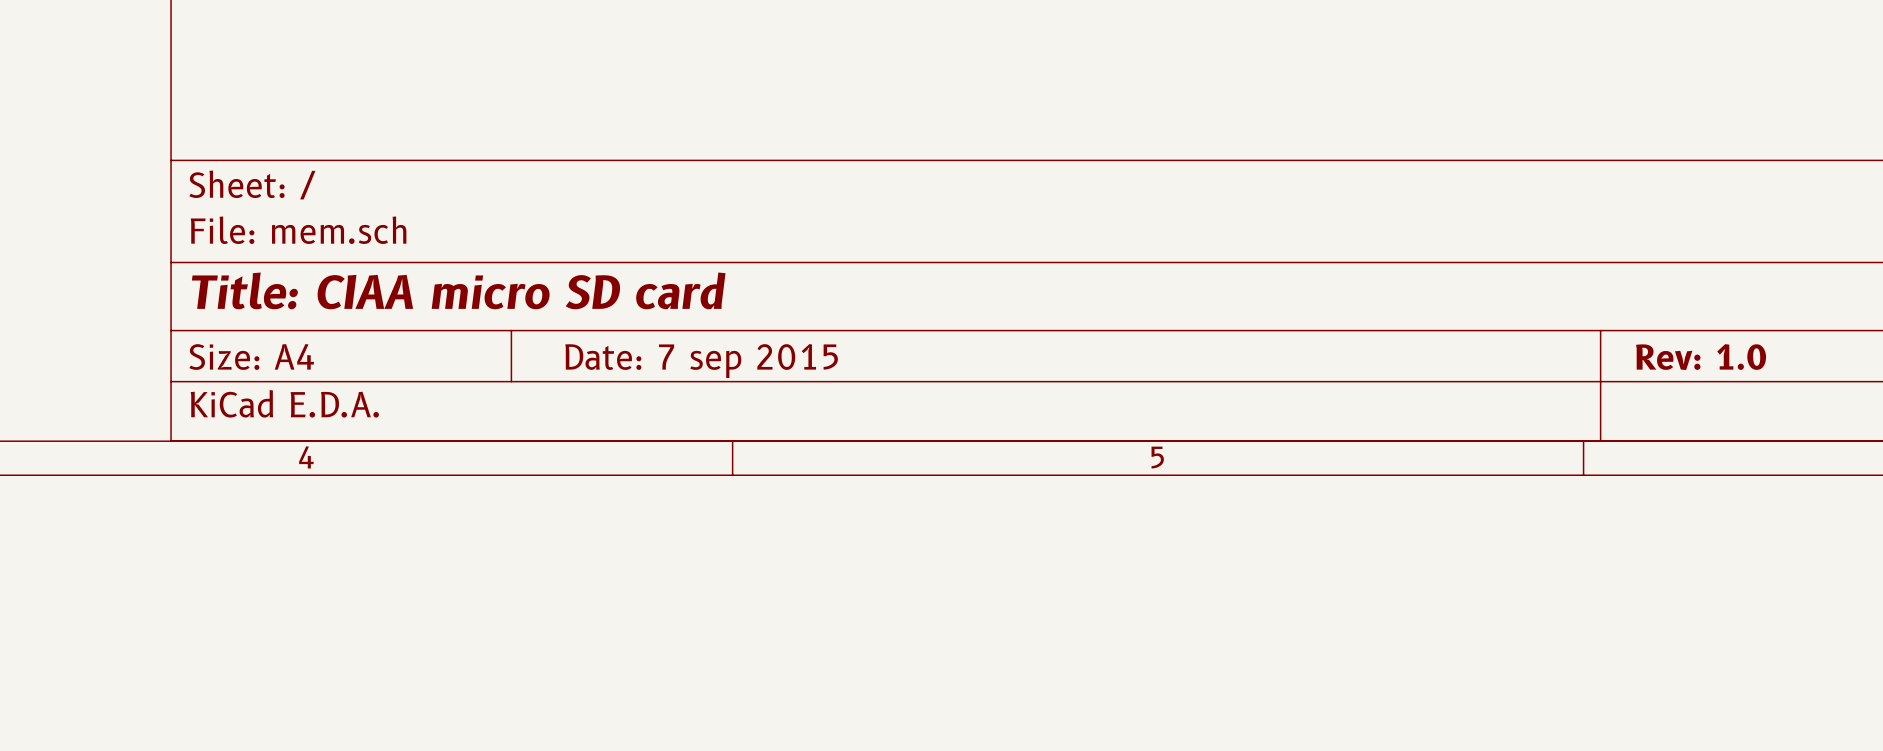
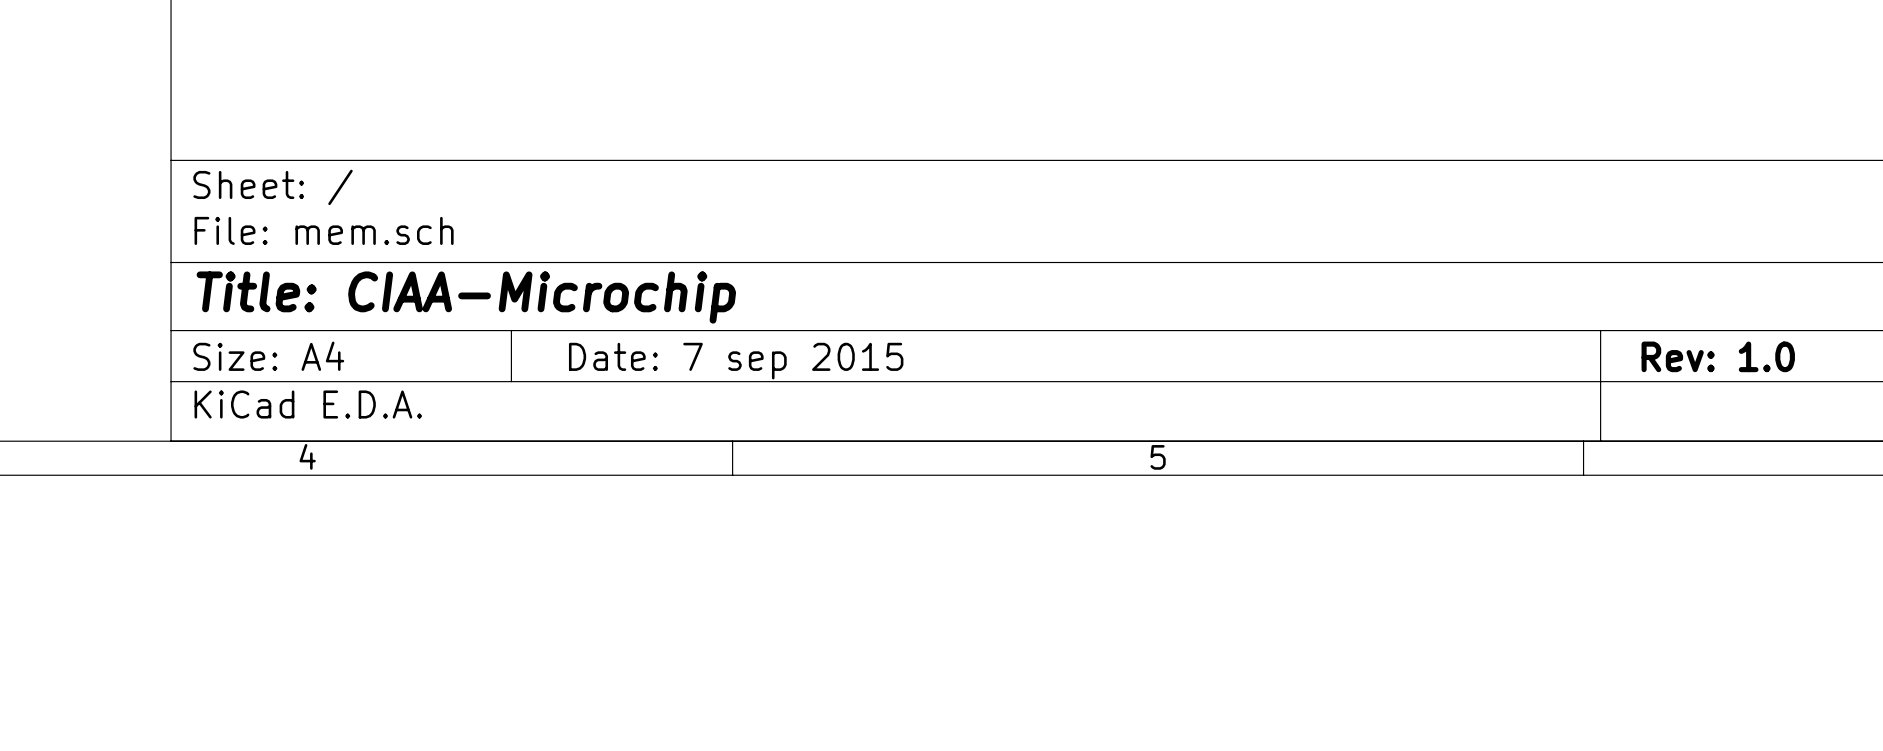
title block: Title: CIAA micro SD card (458, 290) -> Title: CIAA-Microchip (466, 297)

